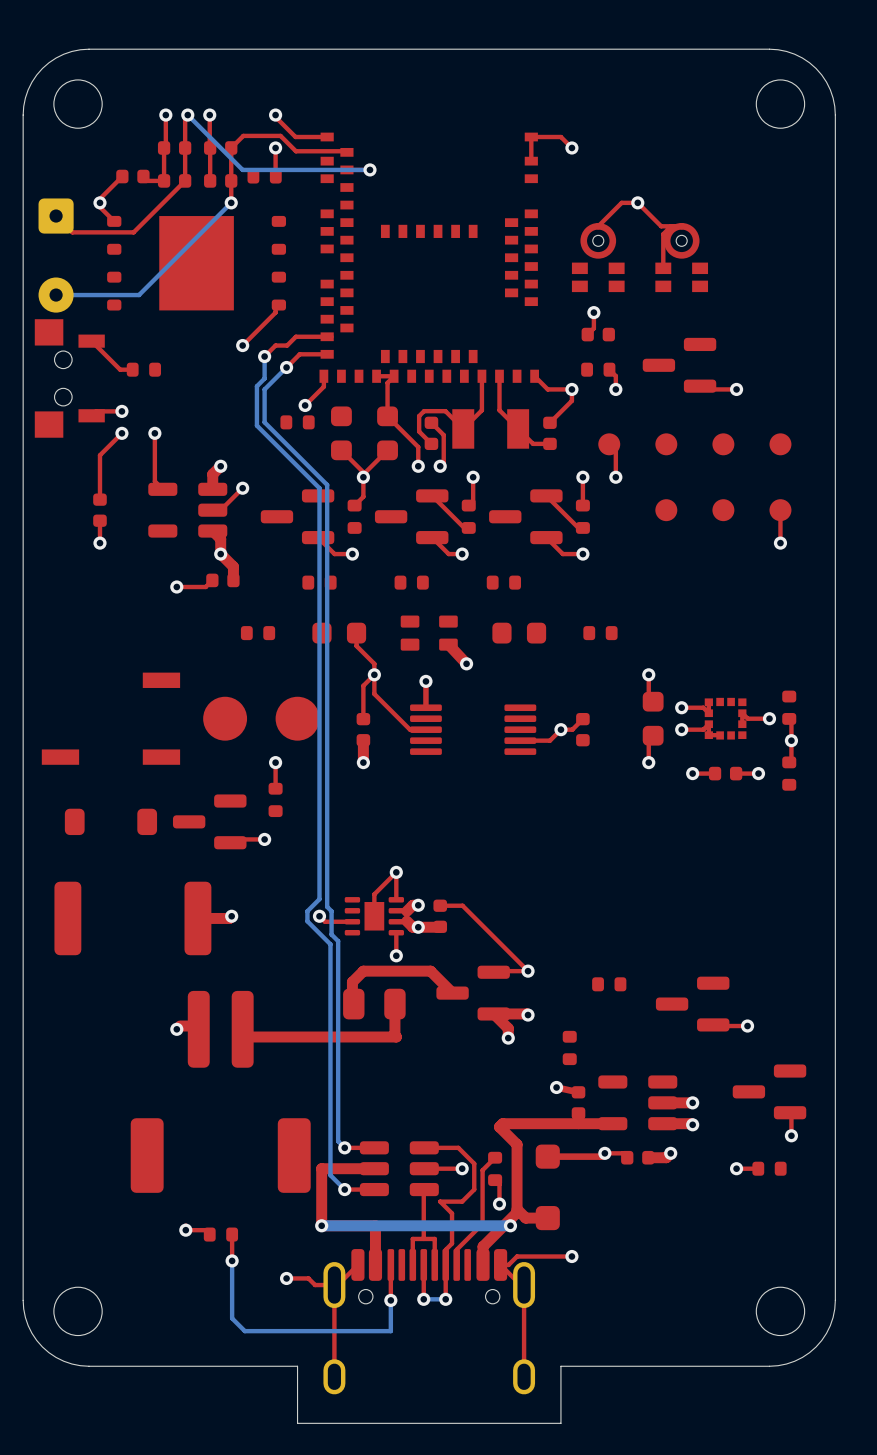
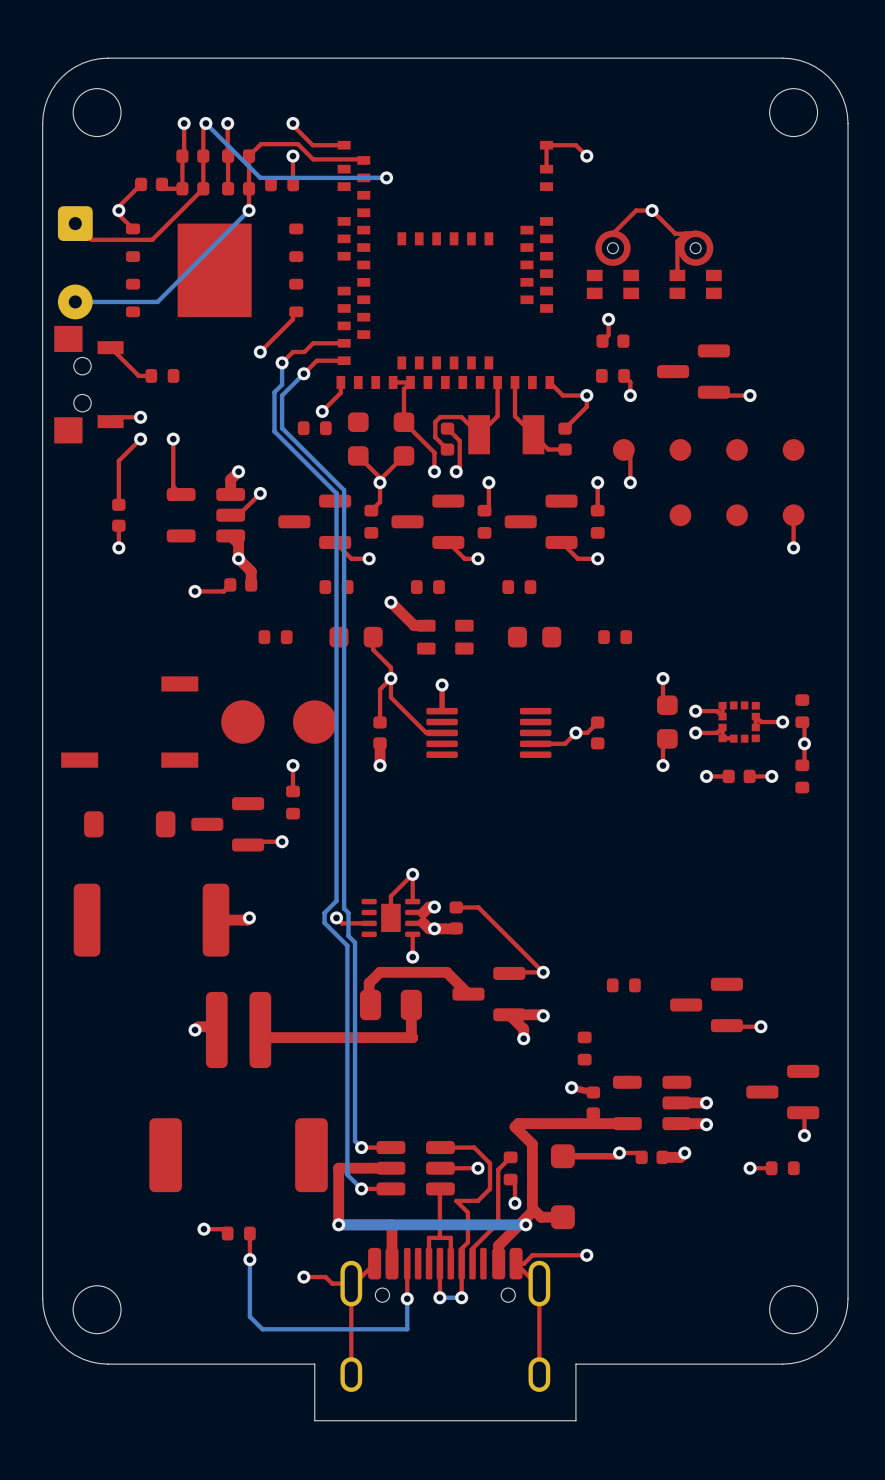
top track: (432, 495) (464, 527) (468, 527) -> none
top track: (546, 495) (578, 527) (582, 527) -> none
top track: none -> (390, 602) (414, 625) (426, 625)
top track: (448, 644) (466, 663) -> none
via position: (466, 663) -> (390, 602)

